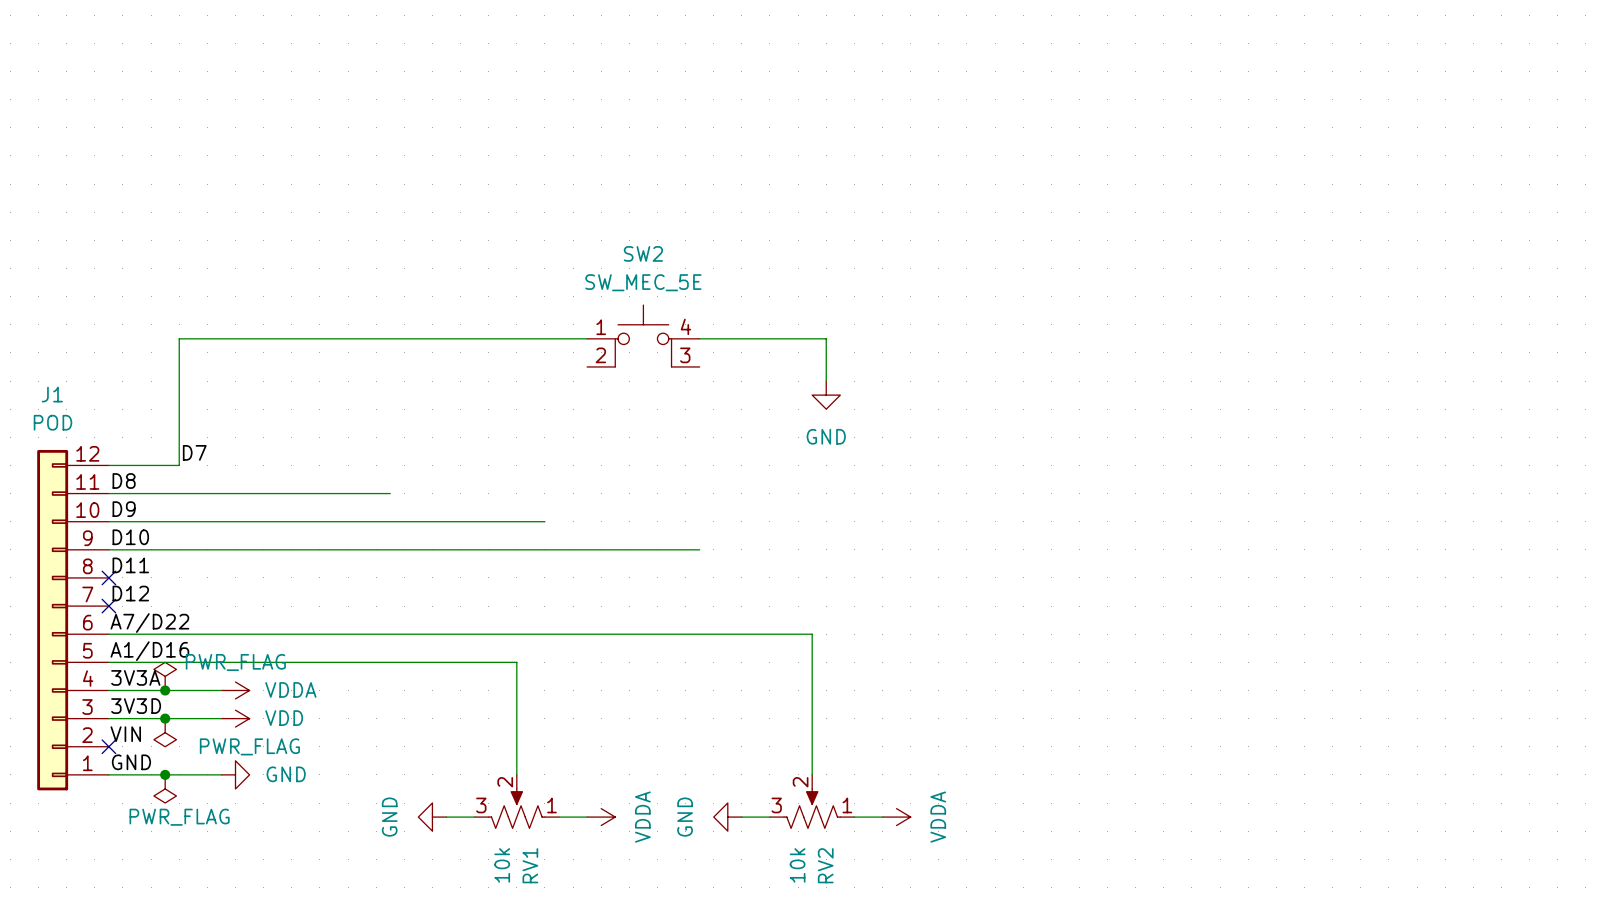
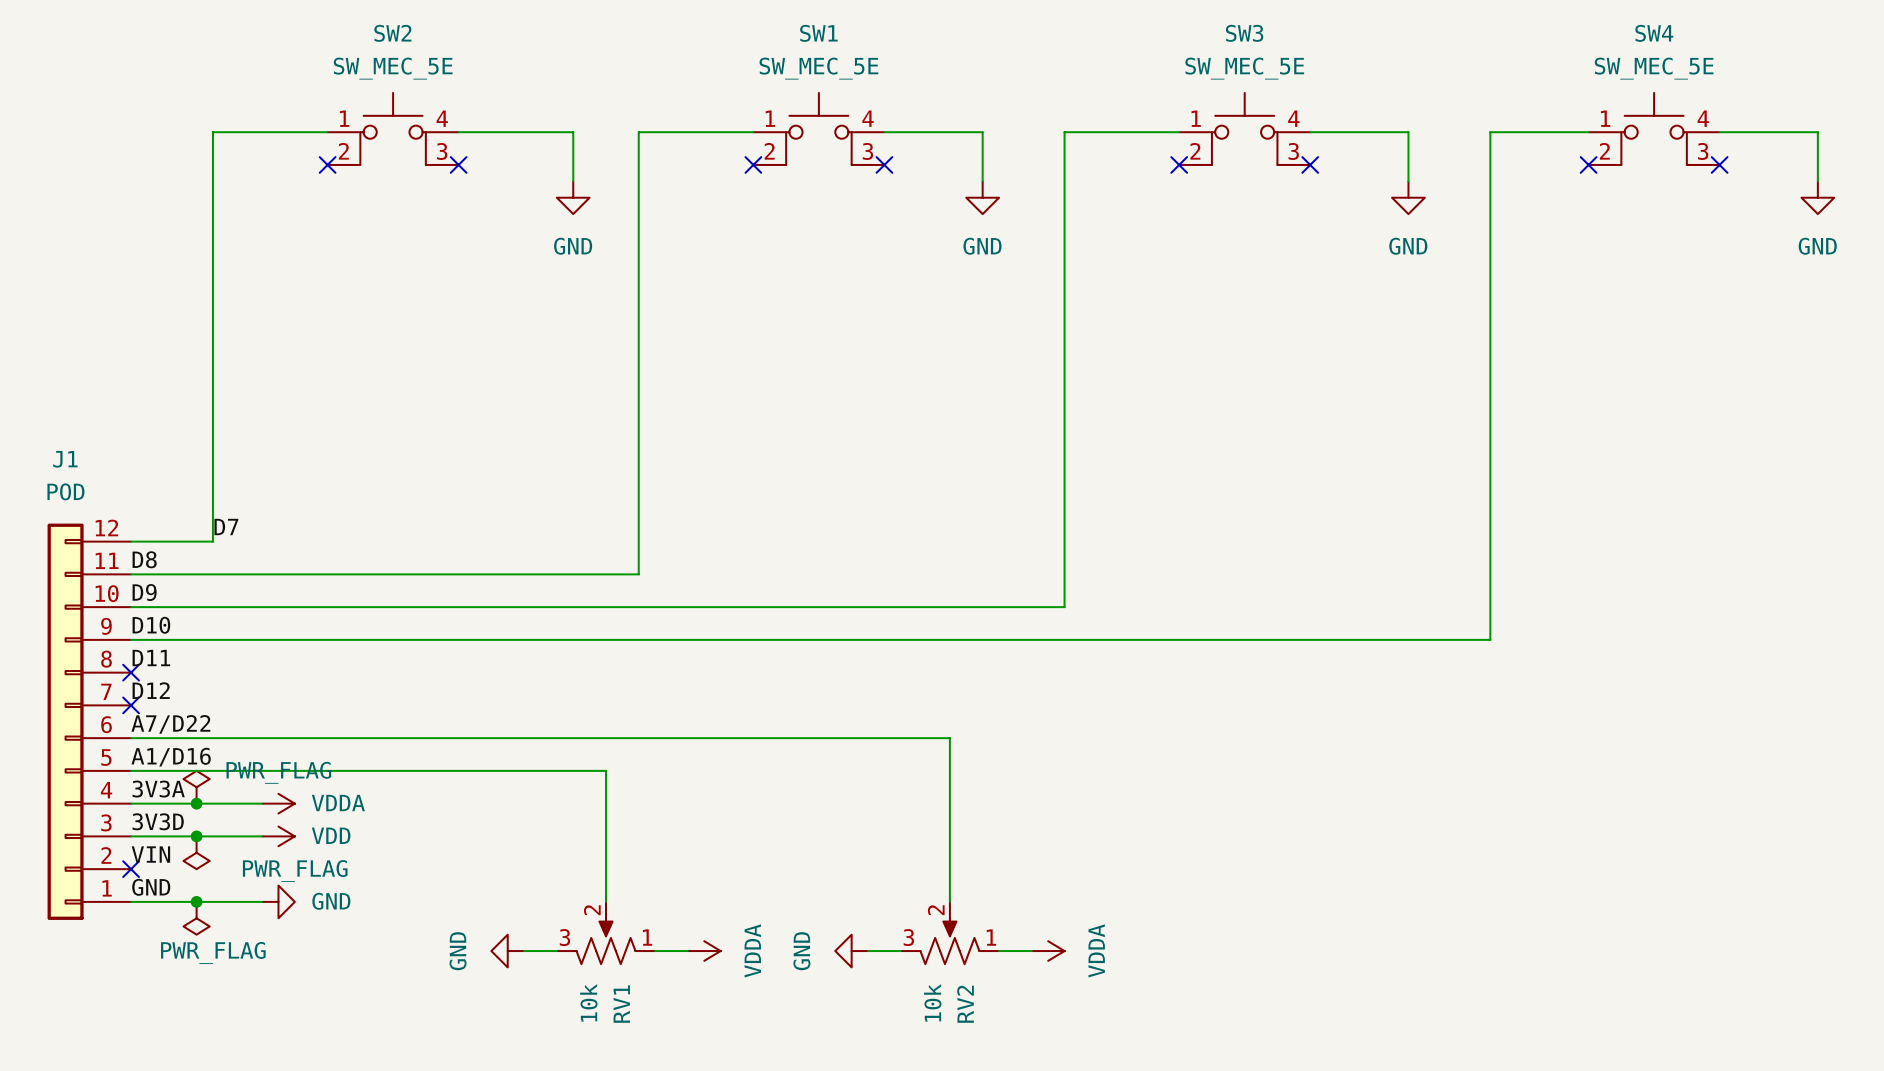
SW1: none -> SW_MEC_5E (818, 128)
SW3: none -> SW_MEC_5E (1244, 128)
SW4: none -> SW_MEC_5E (1654, 128)
wire: none -> (458, 132) (573, 132) (573, 181)
wire: none -> (753, 132) (638, 132) (638, 574) (458, 574)
wire: none -> (884, 132) (982, 132) (982, 181)
wire: none -> (1179, 132) (1064, 132) (1064, 607) (638, 607)
wire: none -> (1310, 132) (1408, 132) (1408, 181)
wire: none -> (1588, 132) (1490, 132) (1490, 639) (818, 639)
wire: none -> (1719, 132) (1817, 132) (1817, 181)
no-connect mark: none -> (327, 164)
no-connect mark: none -> (458, 164)
no-connect mark: none -> (753, 164)
no-connect mark: none -> (884, 164)
no-connect mark: none -> (1179, 164)
no-connect mark: none -> (1310, 164)
no-connect mark: none -> (1588, 164)
no-connect mark: none -> (1719, 164)
power symbol: none -> GND (573, 197)
power symbol: none -> GND (982, 197)
power symbol: none -> GND (1408, 197)
power symbol: none -> GND (1817, 197)
SW2 position: (643, 336) -> (393, 128)
wire: (179, 338) (587, 338) -> (212, 394) (212, 132) (327, 132)
wire: (699, 338) (826, 338) (826, 381) -> none
power symbol: GND (826, 395) -> none

